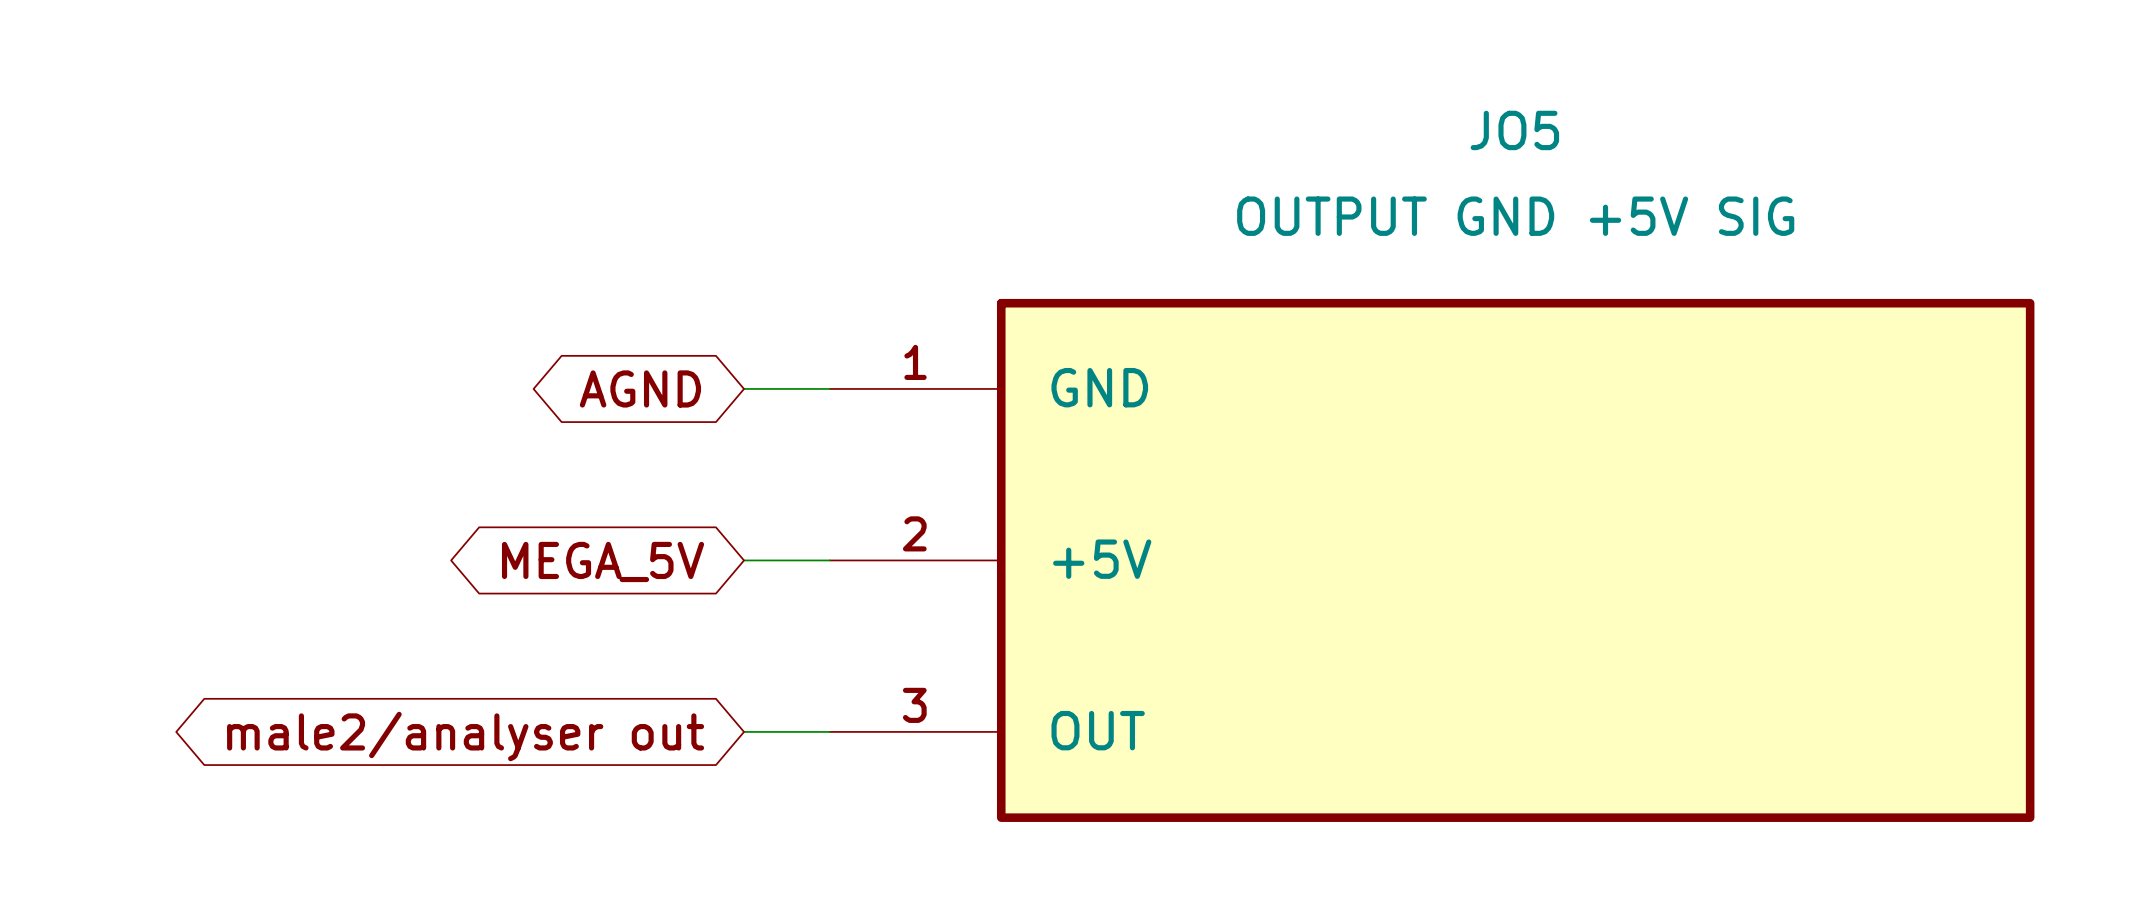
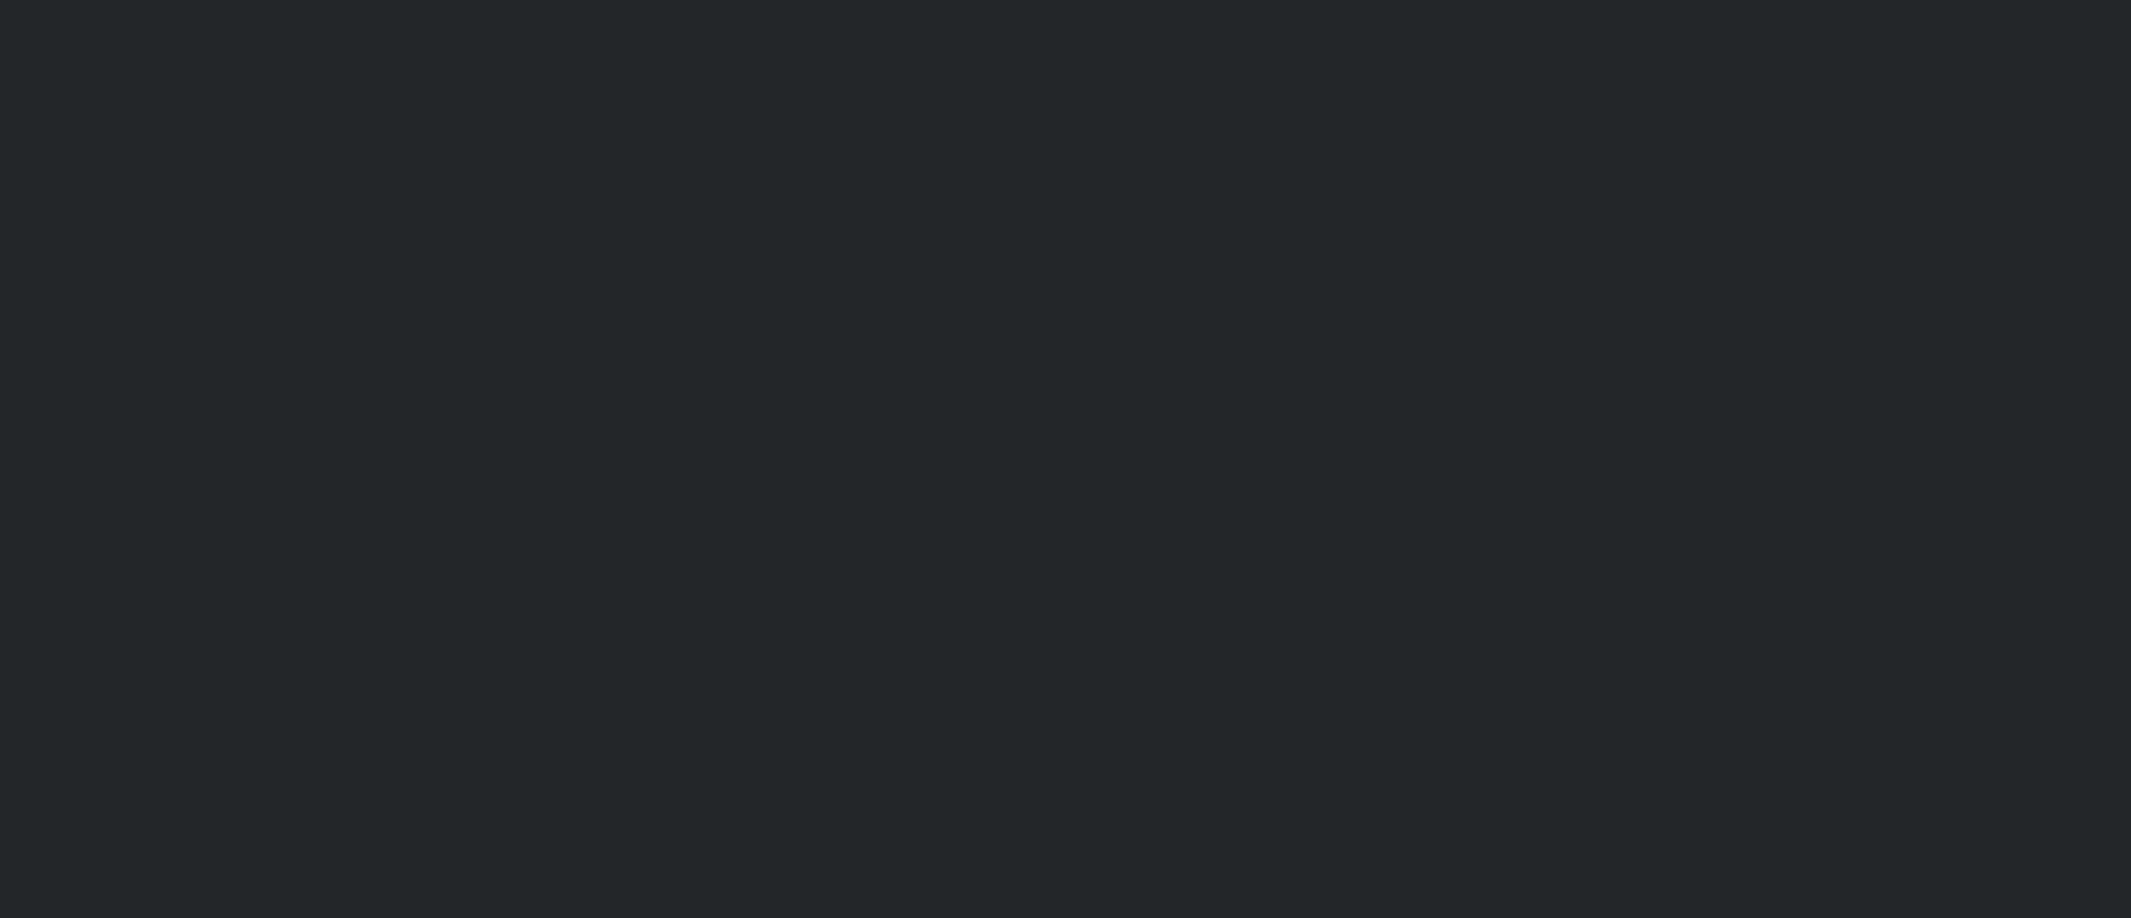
global label: AGND (640, 388) -> none
wire: (744, 388) (829, 388) -> none
wire: (744, 560) (829, 560) -> none
JO5: OUTPUT GND +5V SIG (1432, 560) -> none
global label: MEGA_5V (603, 561) -> none
wire: (744, 731) (829, 731) -> none
global label: male2/analyser out (465, 736) -> none

